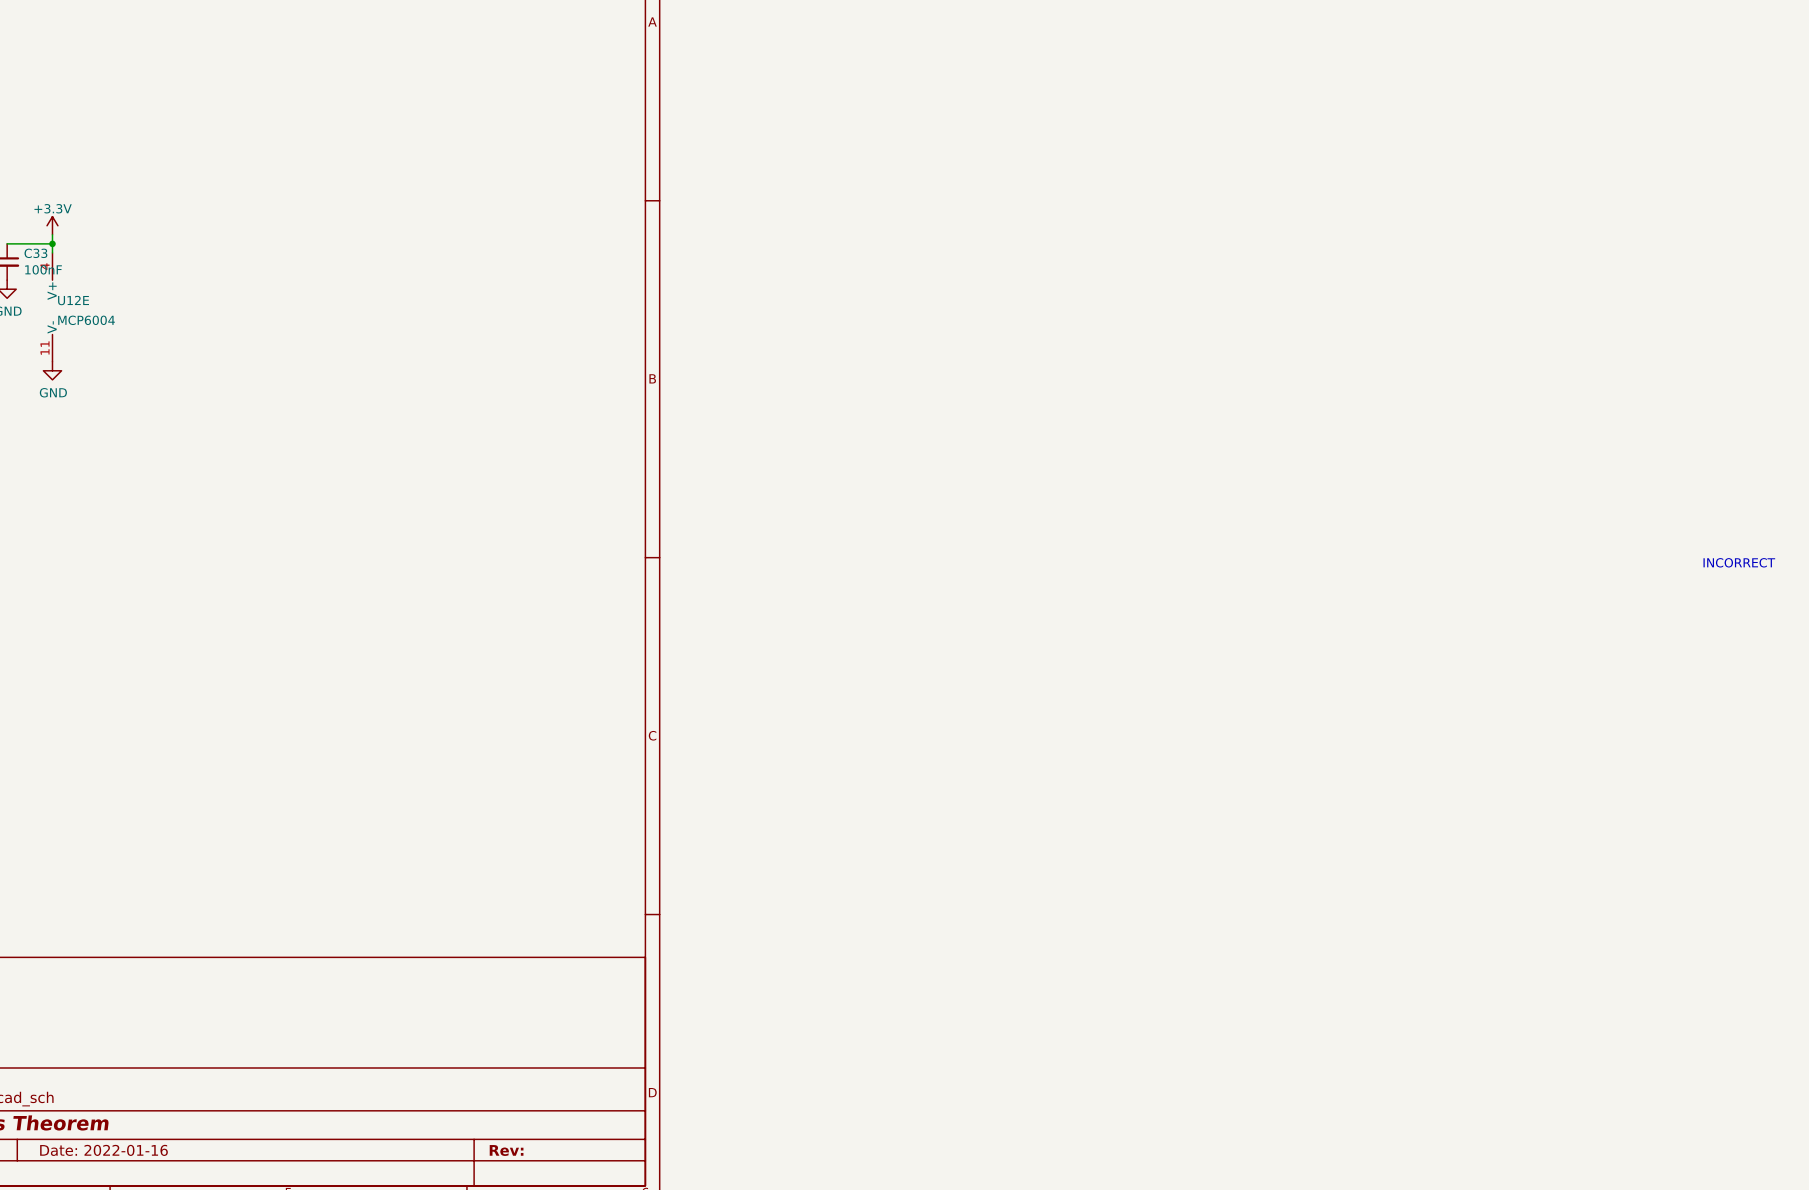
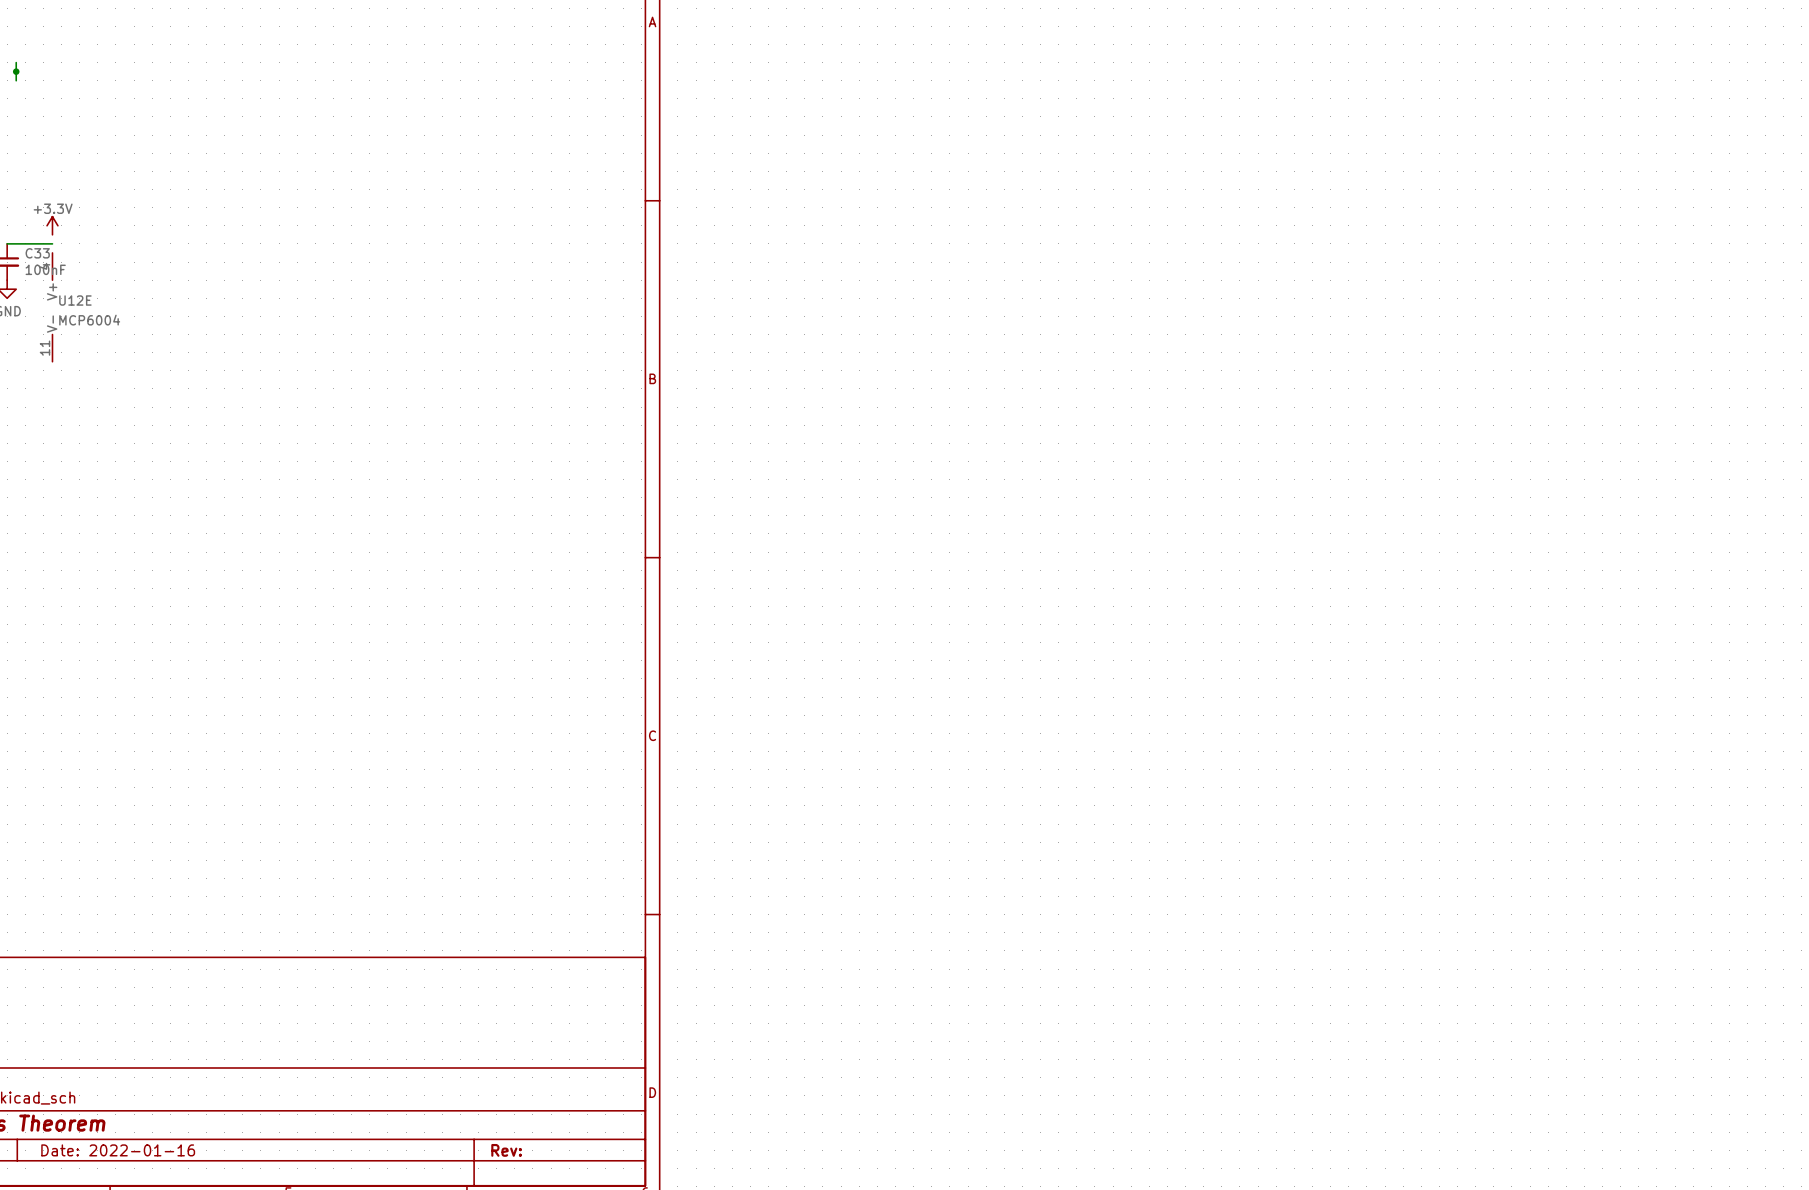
junction: none -> (16, 71)
wire: (52, 234) (52, 252) -> (16, 62) (16, 80)
junction: (52, 243) -> none
power symbol: GND (52, 370) -> none
text: INCORRECT (1739, 562) -> none

